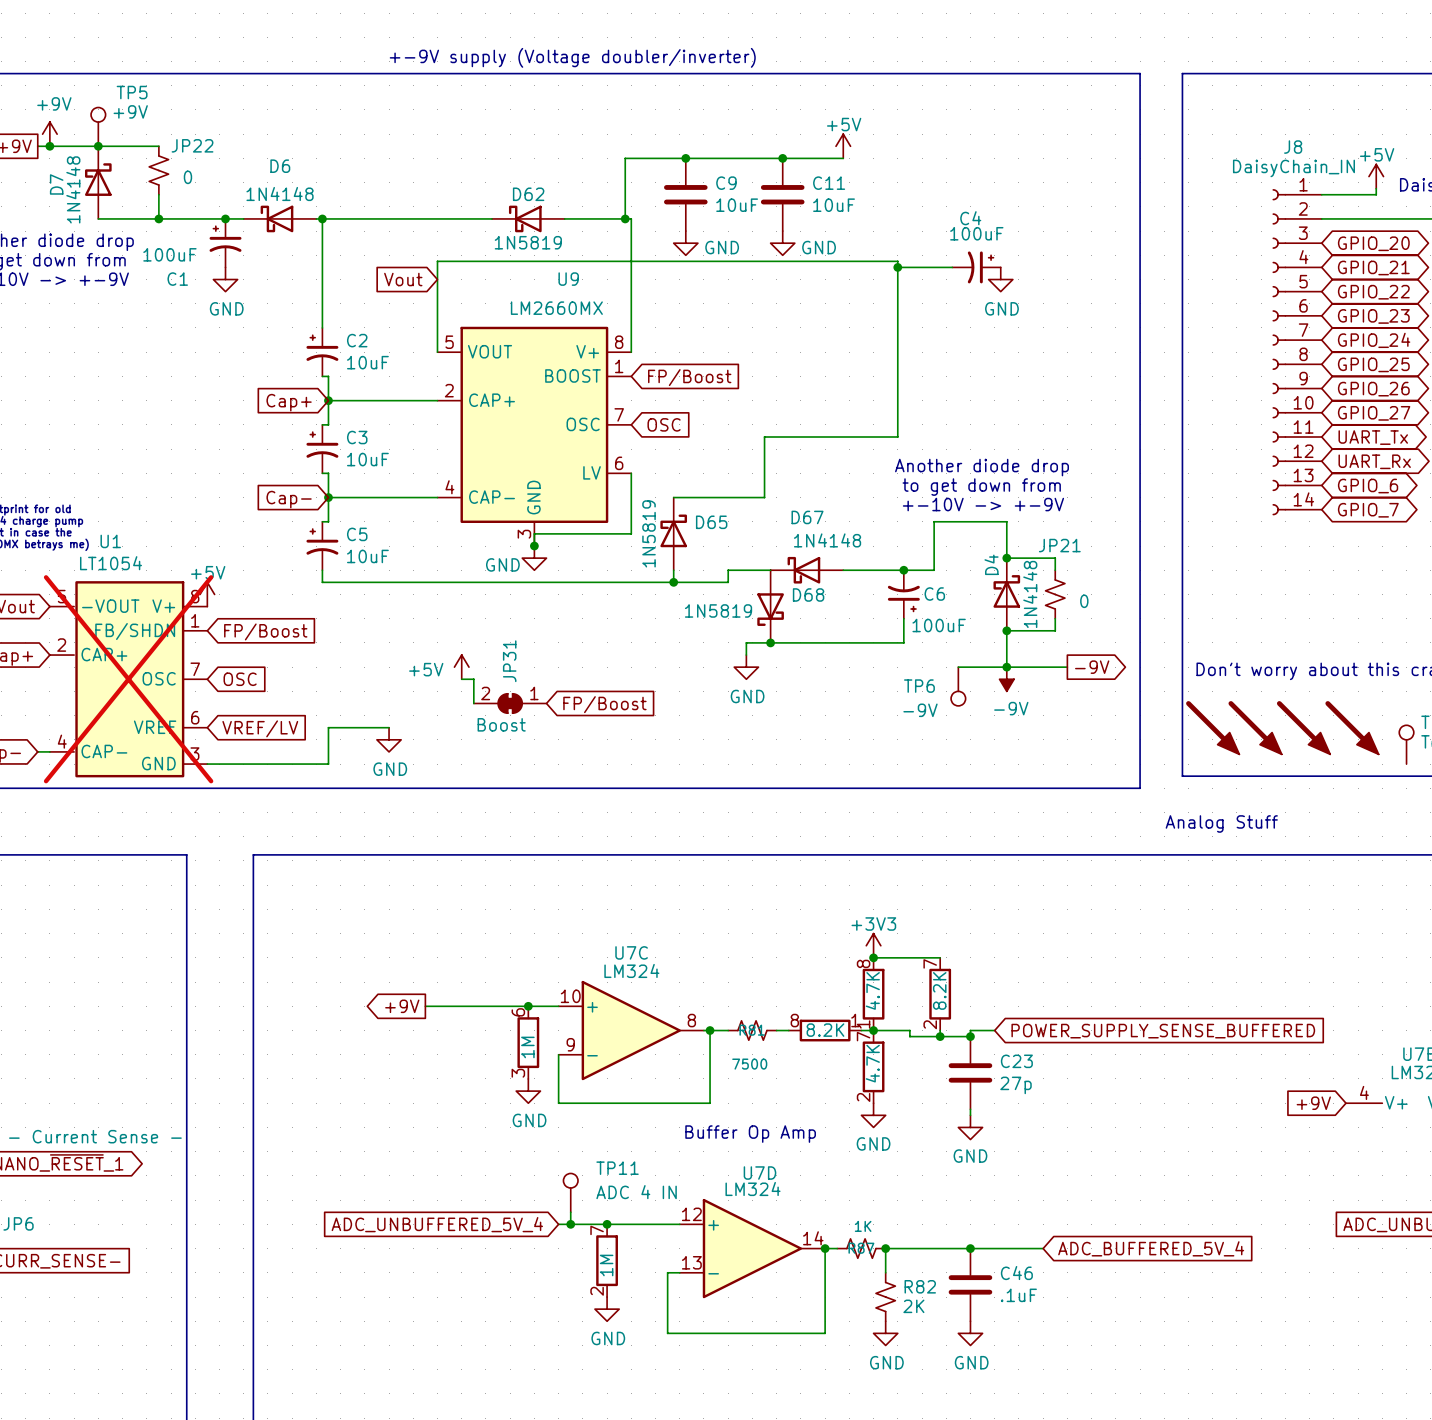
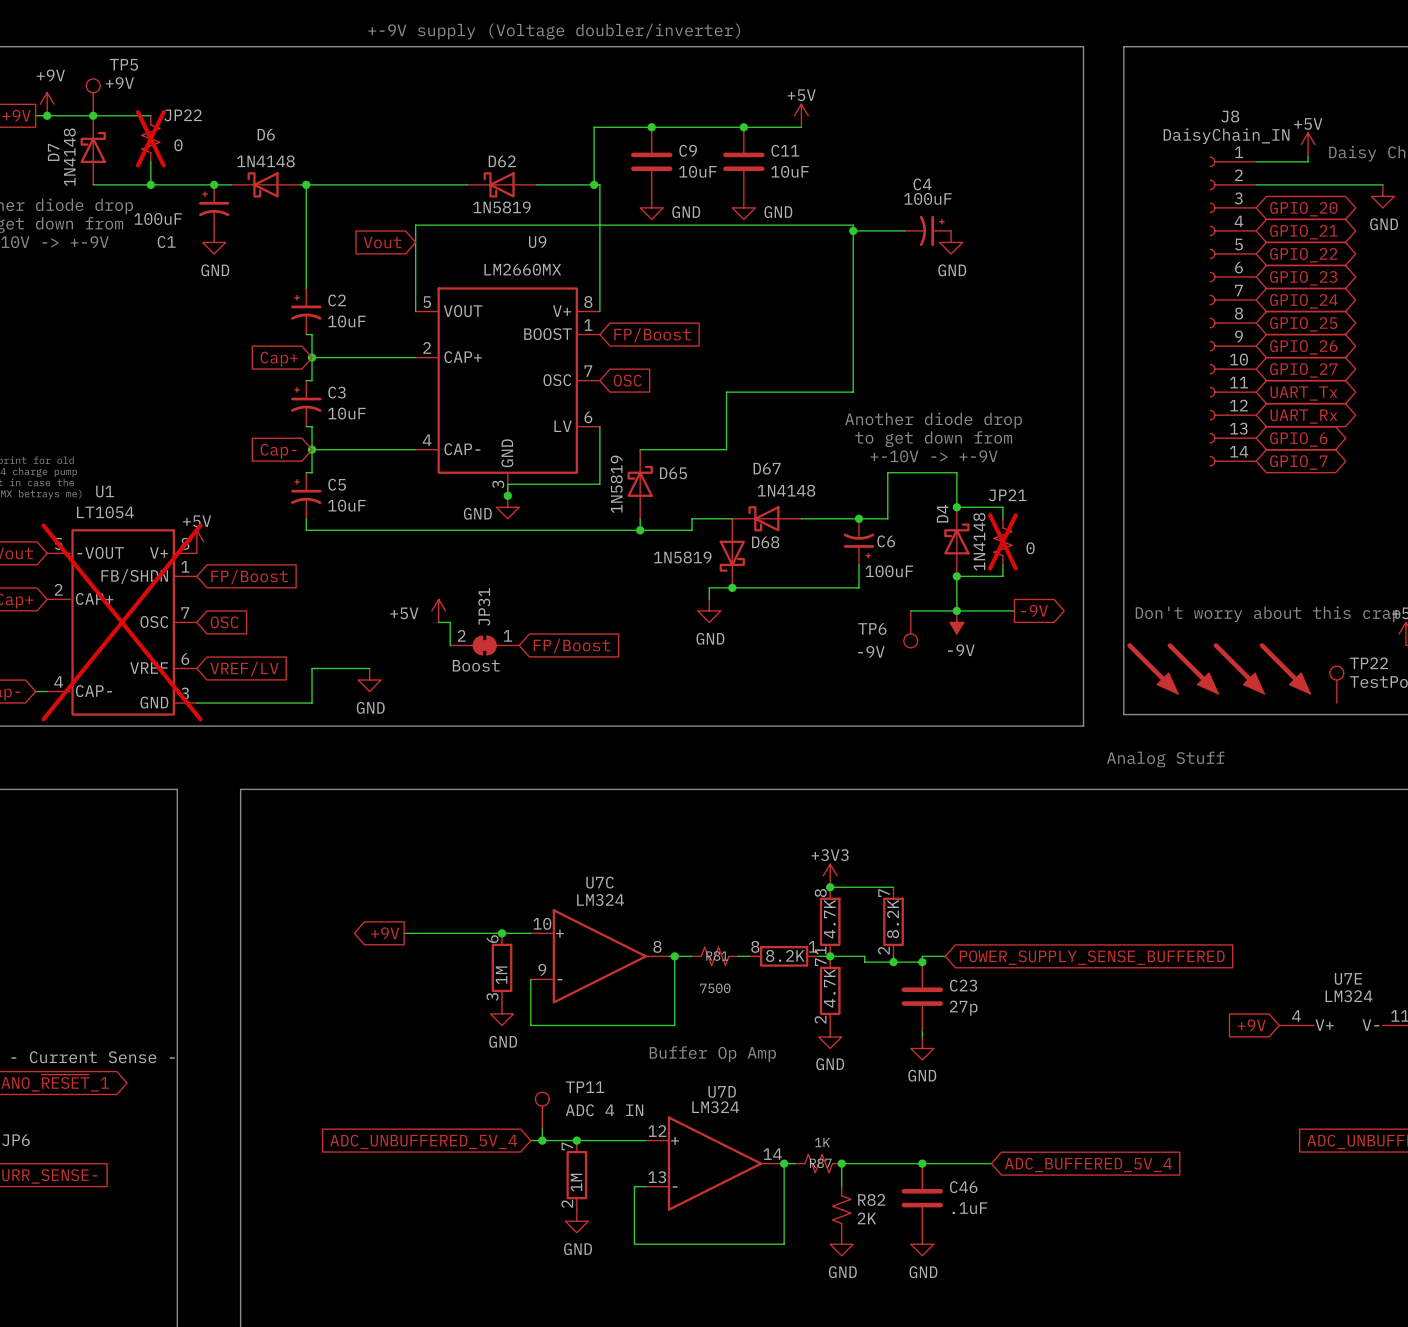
JP22 do-not-place cross: none -> (150, 138)
JP21 do-not-place cross: none -> (1002, 541)

